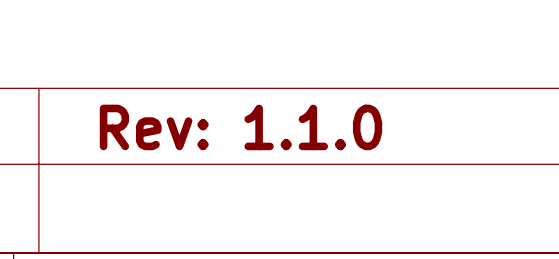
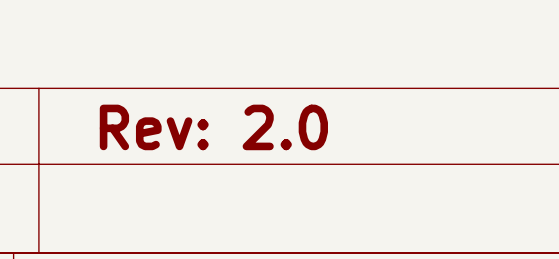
title block: Rev: 1.1.0 (241, 127) -> Rev: 2.0 (213, 127)

